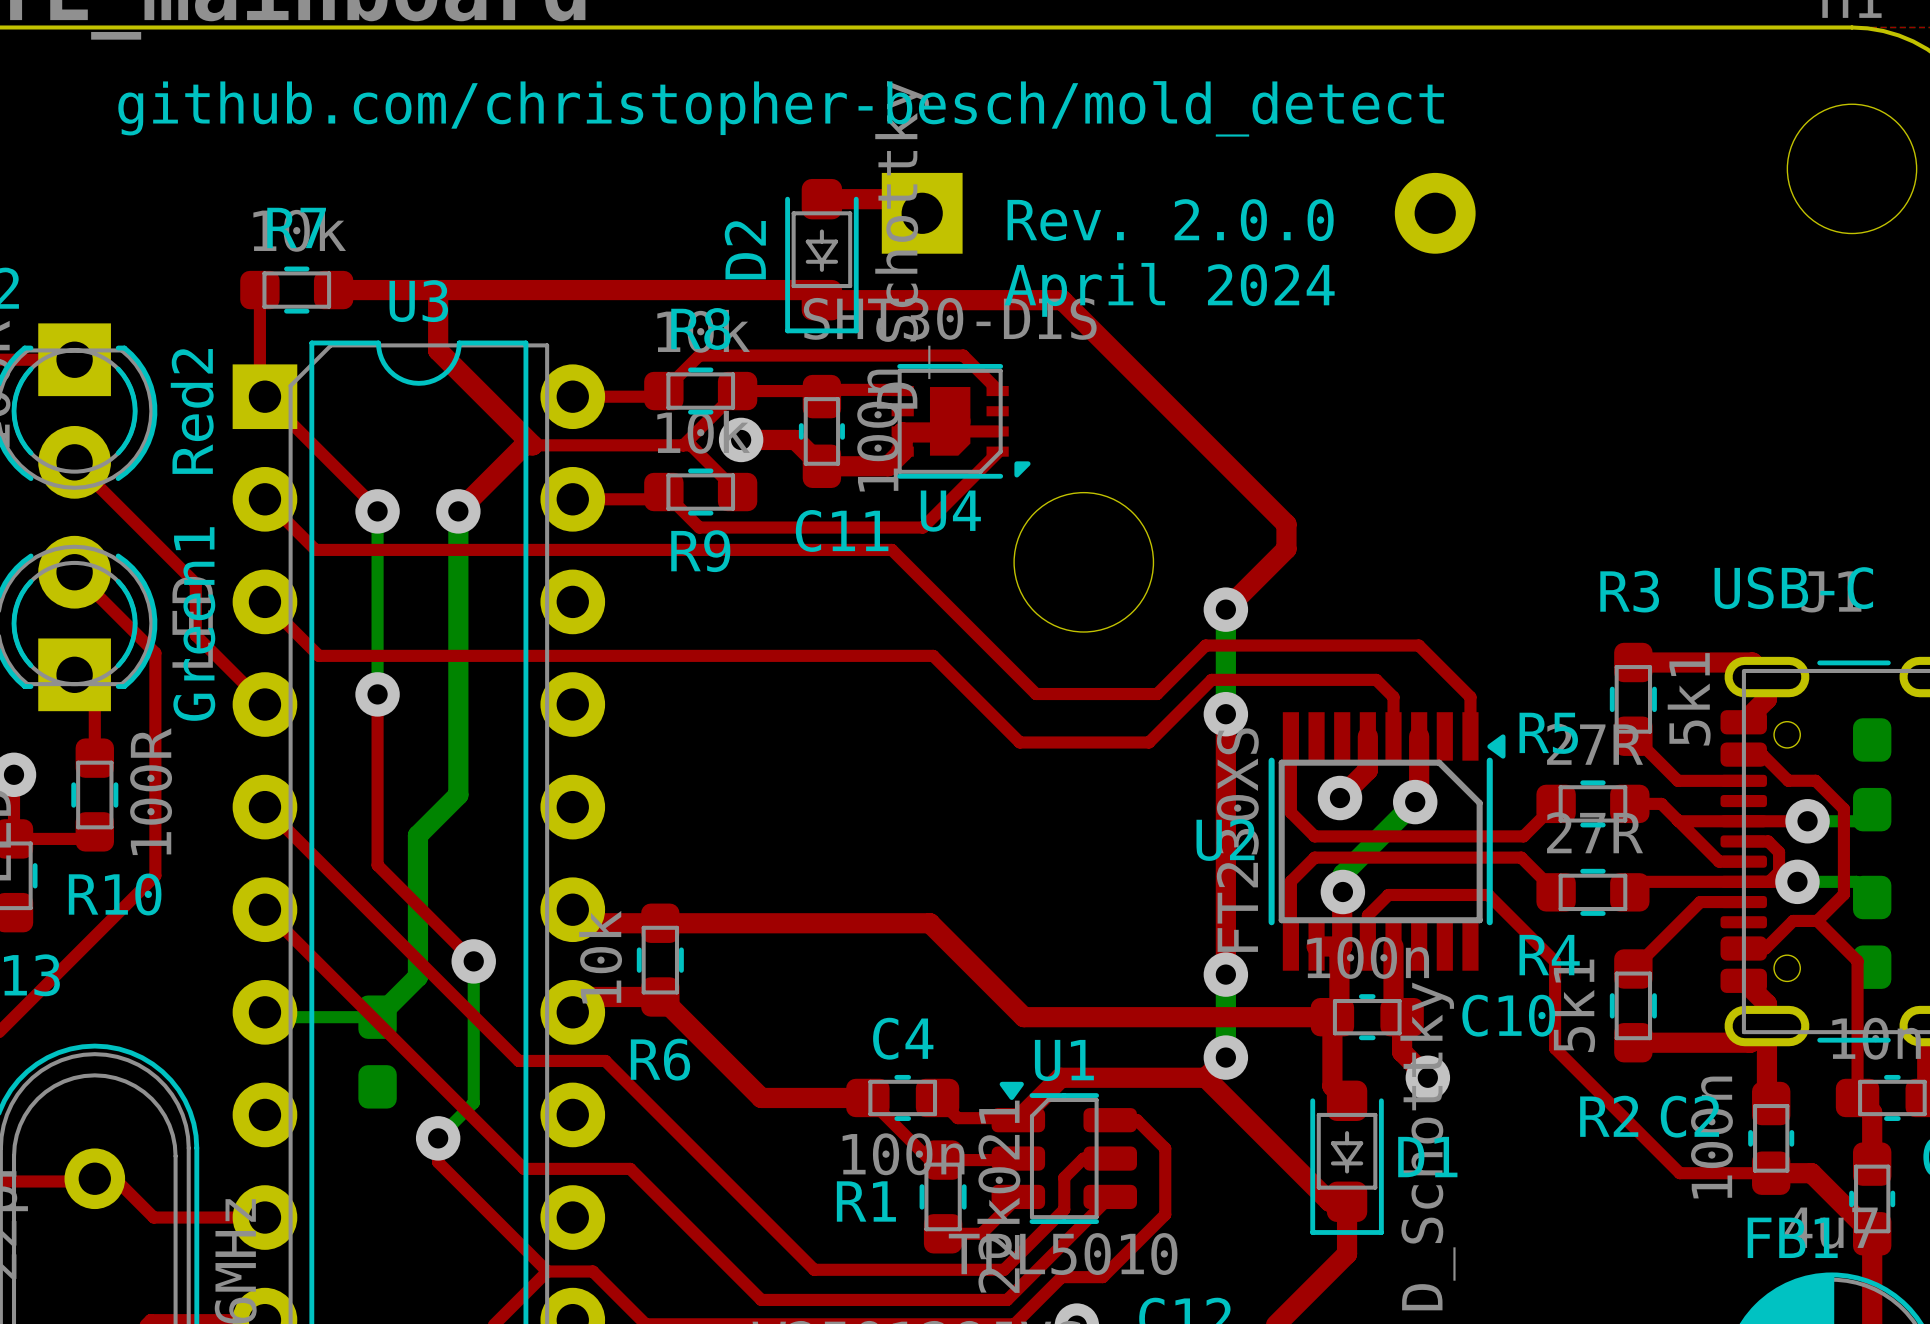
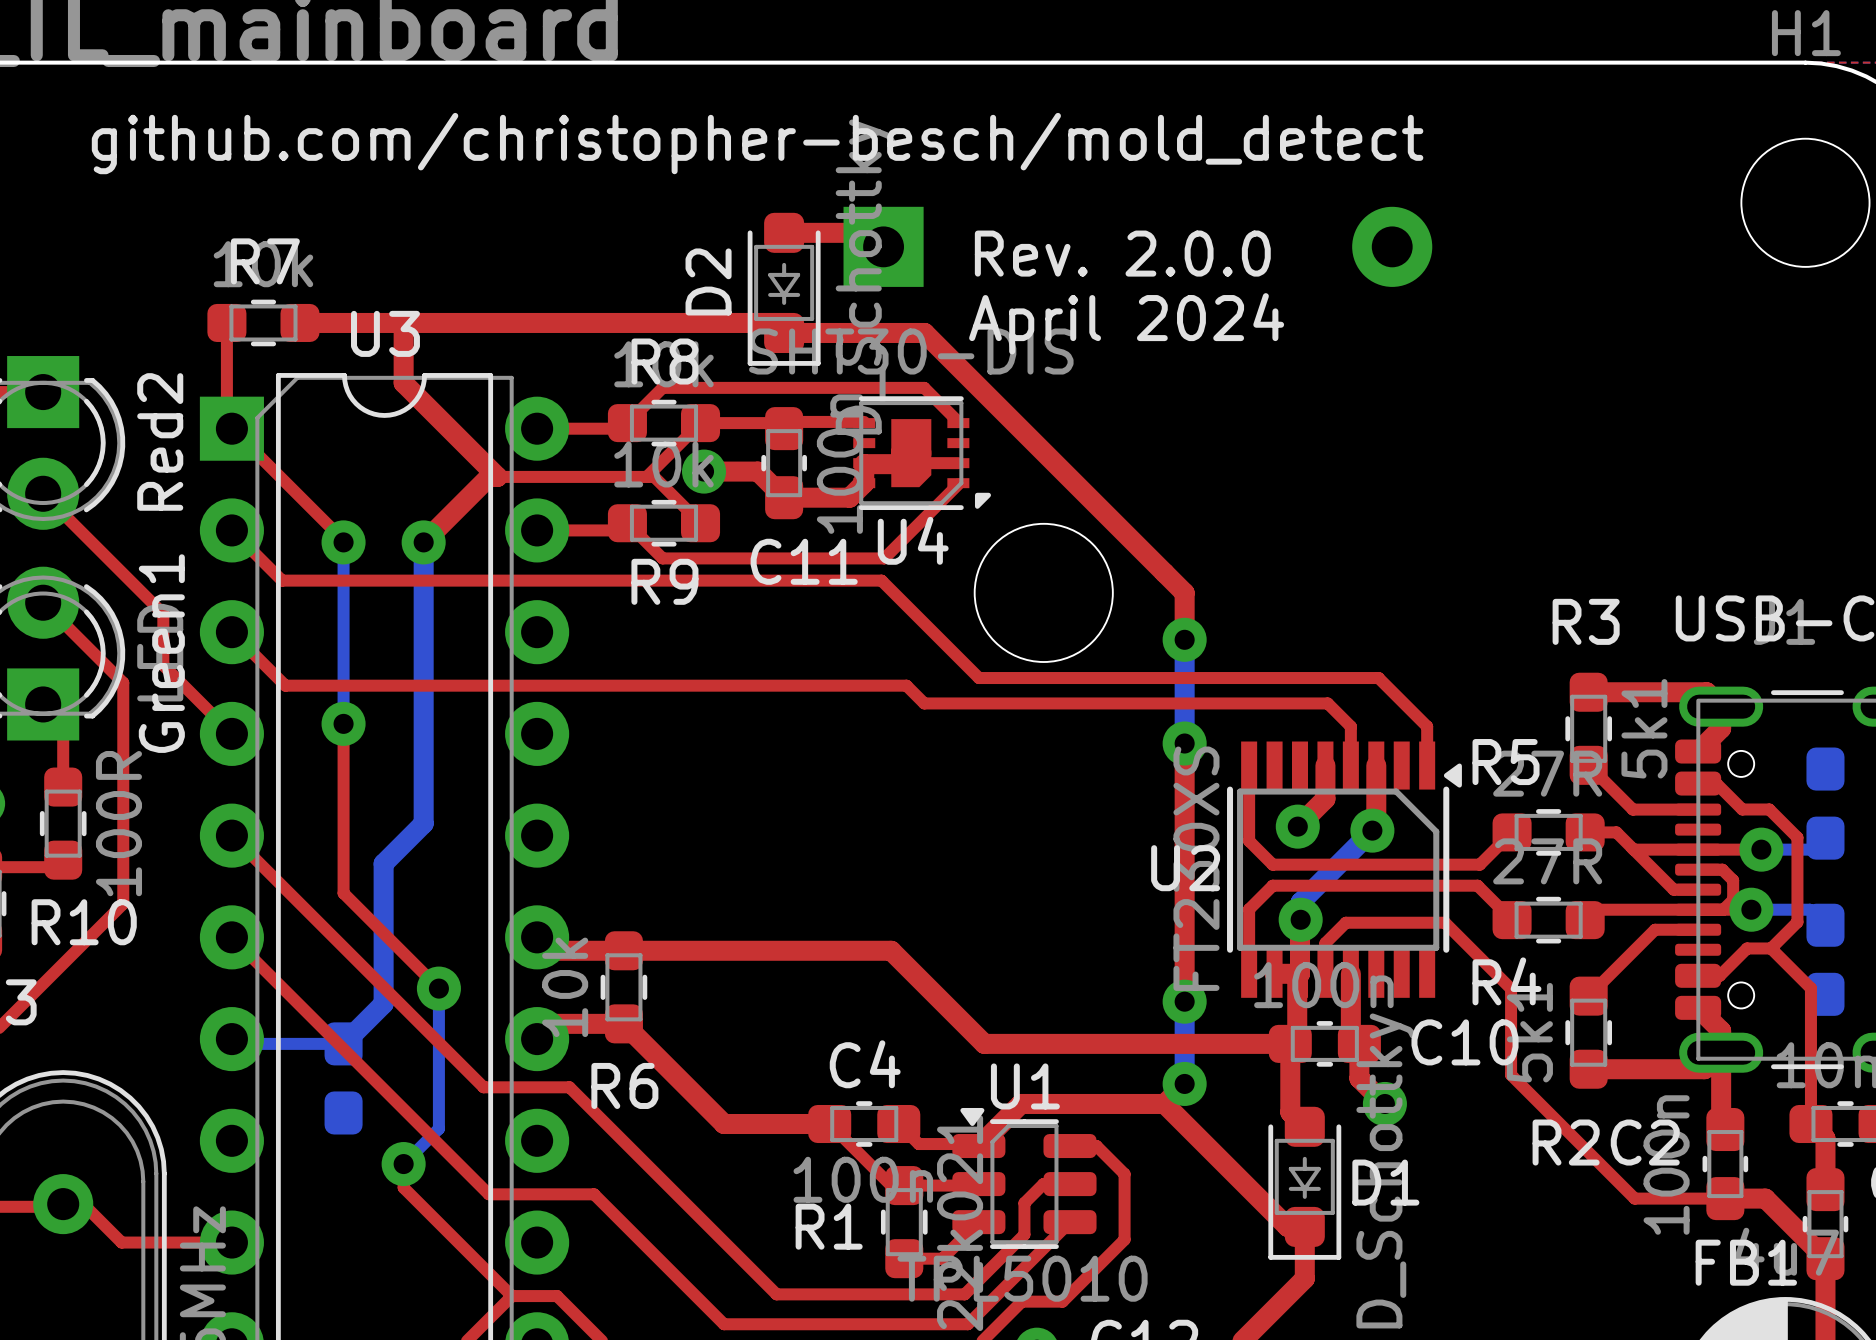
top track: (963, 300) (1062, 300) (1286, 524) (1286, 549) (1225, 609) -> (924, 332) (1184, 592) (1184, 639)
top track: (891, 549) (1036, 694) (1157, 694) (1205, 645) (1418, 645) (1421, 648) -> (853, 580) (881, 580) (978, 678) (1378, 678)
top track: (933, 655) (1019, 742) (1149, 742) (1211, 679) (1376, 679) -> (894, 685) (906, 685) (924, 703) (1327, 703) (1333, 709)

